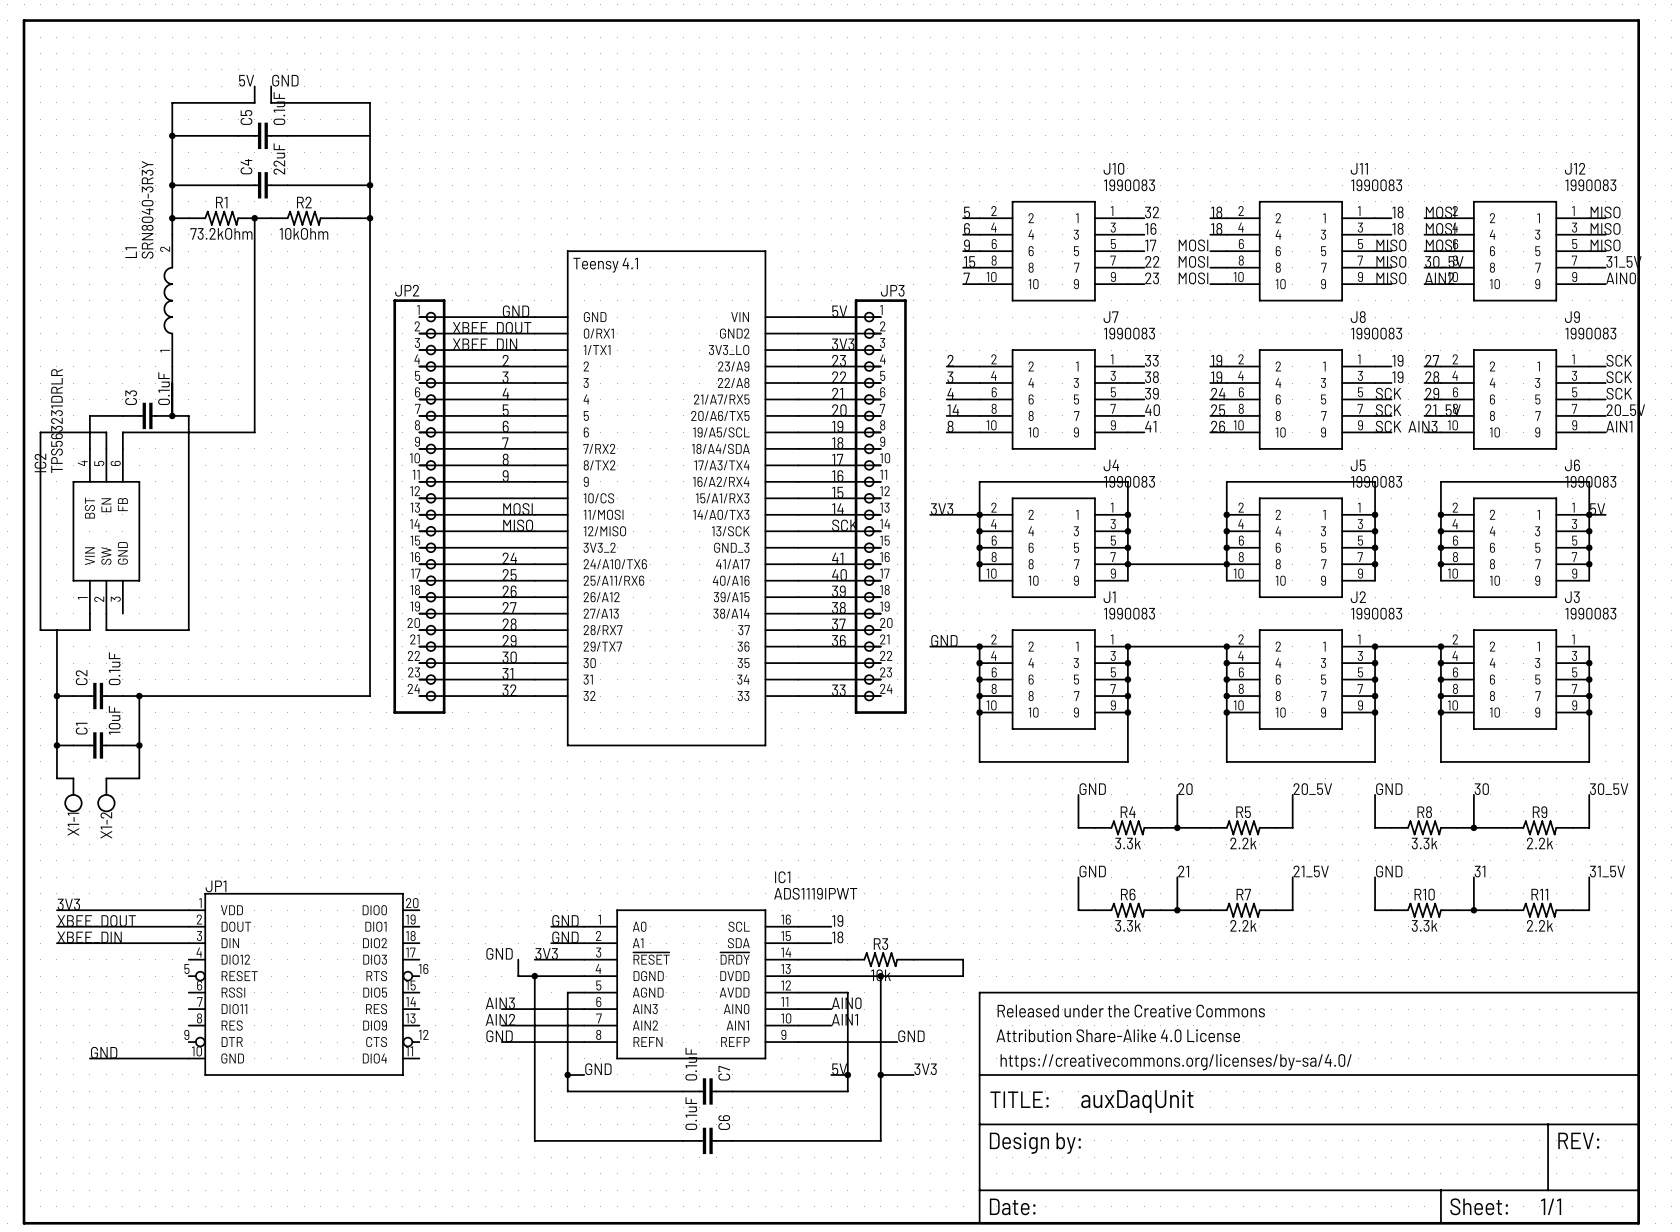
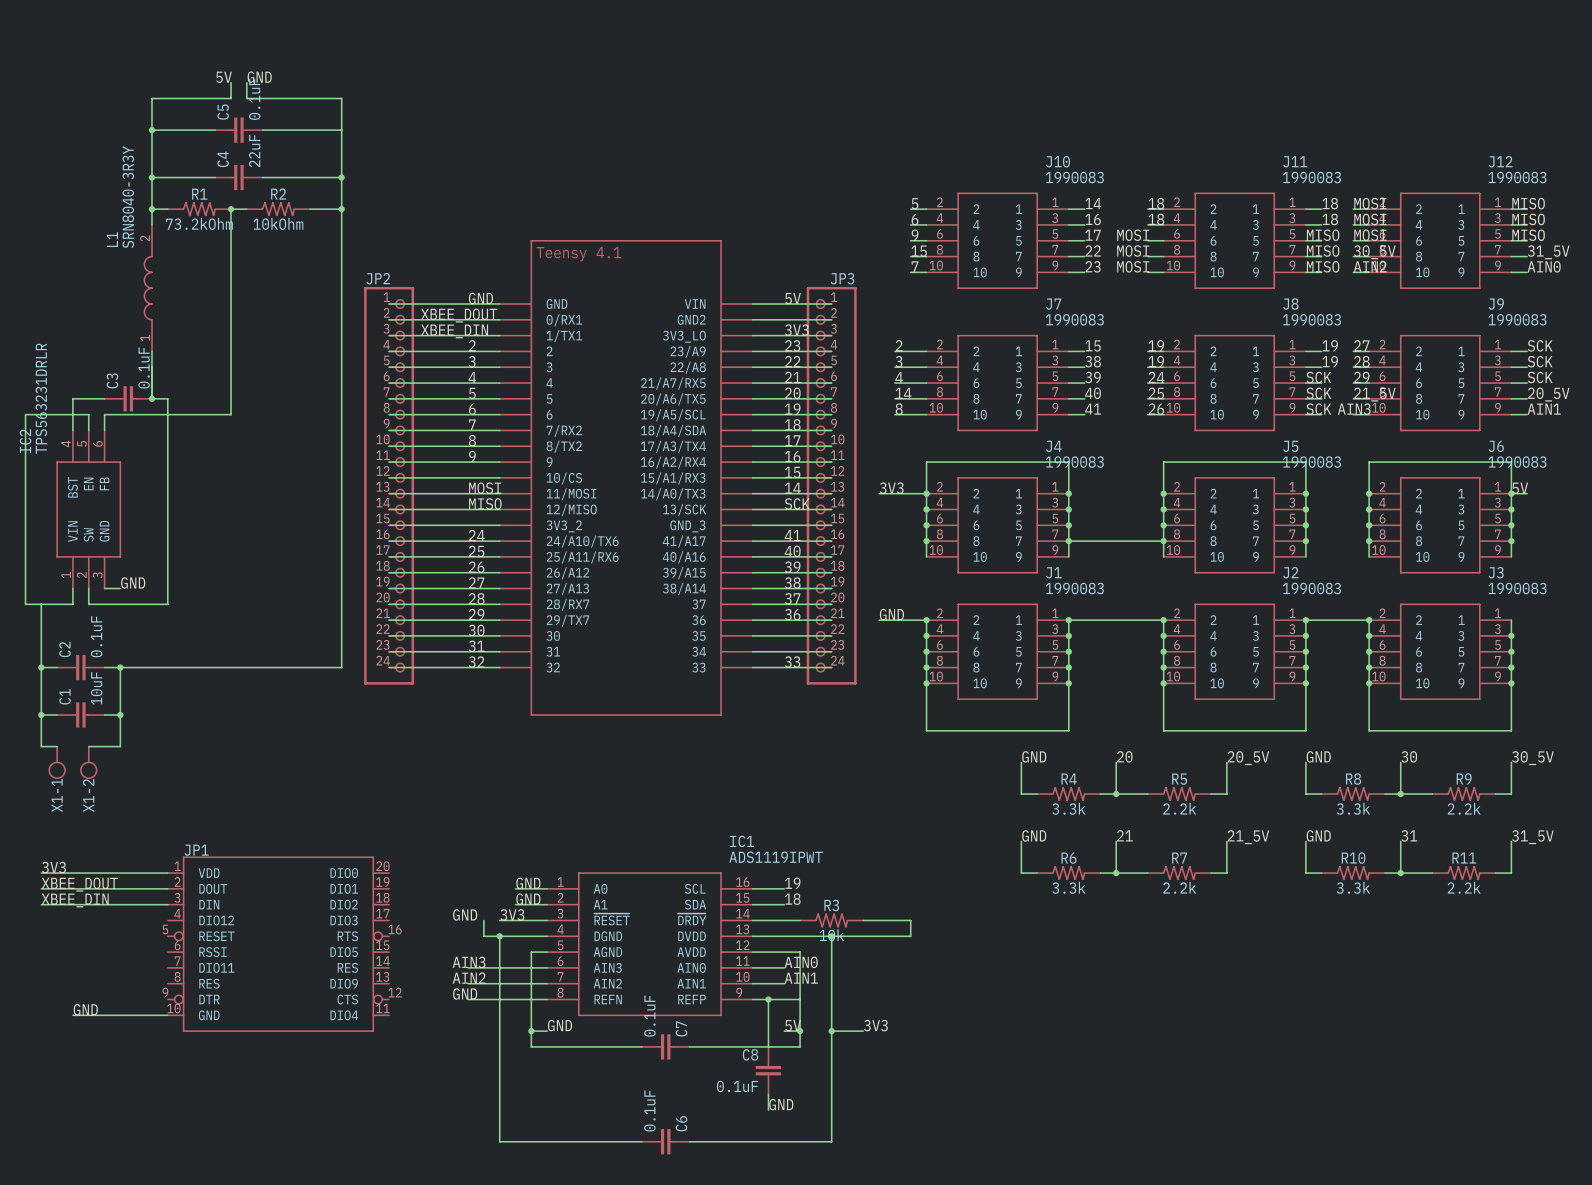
label: 32 (1152, 212) -> 14 (1093, 203)
label: 33 (1151, 360) -> 15 (1093, 345)
label: none -> GND (133, 583)
wire: none -> (104, 588) (120, 588)
part: (831, 621) -> none
label position: GND (911, 1036) -> GND (781, 1104)
wire: none -> (768, 999) (768, 1046)
junction: none -> (768, 999)
wire: (847, 1042) (897, 1042) -> none
part: (1309, 1107) -> none
C8: none -> 0.1uF (768, 1070)
wire: (534, 1140) (683, 1140) -> (499, 1094) (499, 1141) (642, 1141)
C6 position: (707, 1140) -> (665, 1141)
wire: (732, 1140) (880, 1140) -> (689, 1141) (831, 1141) (831, 1094)
wire: none -> (768, 1094) (768, 1110)

